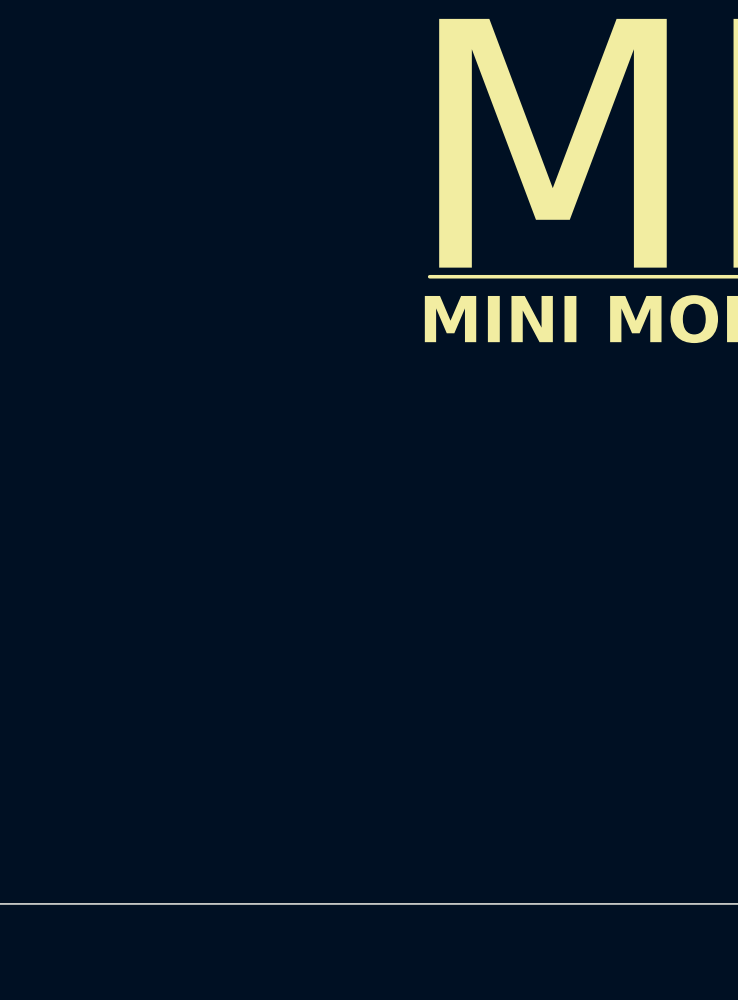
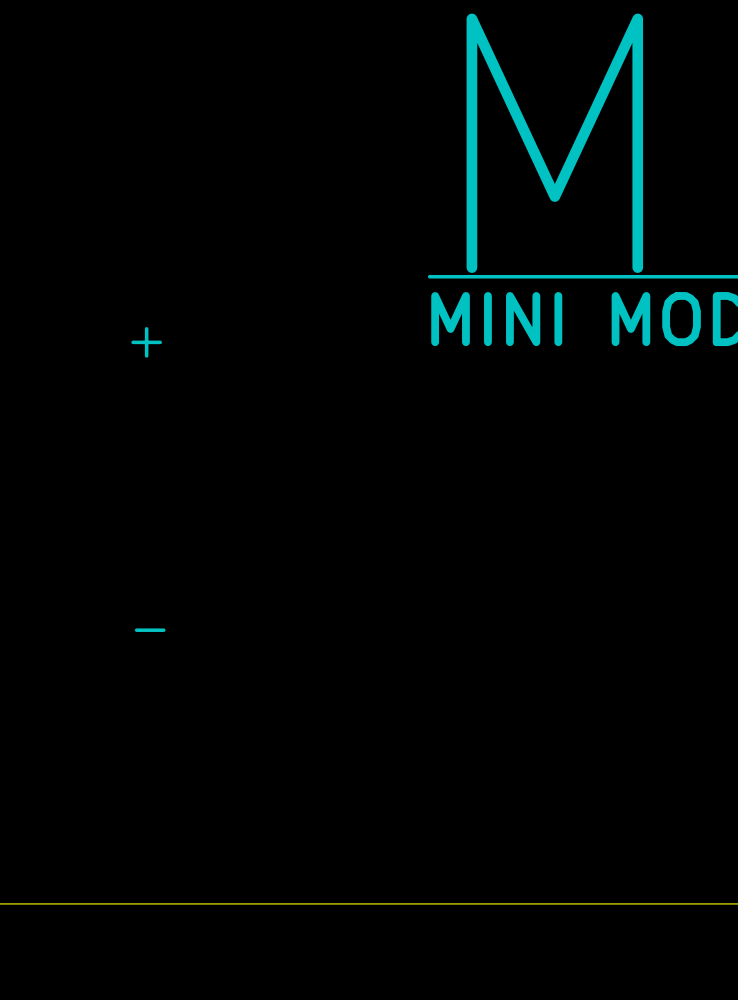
text: none -> + (146, 342)
text: none -> - (150, 630)

